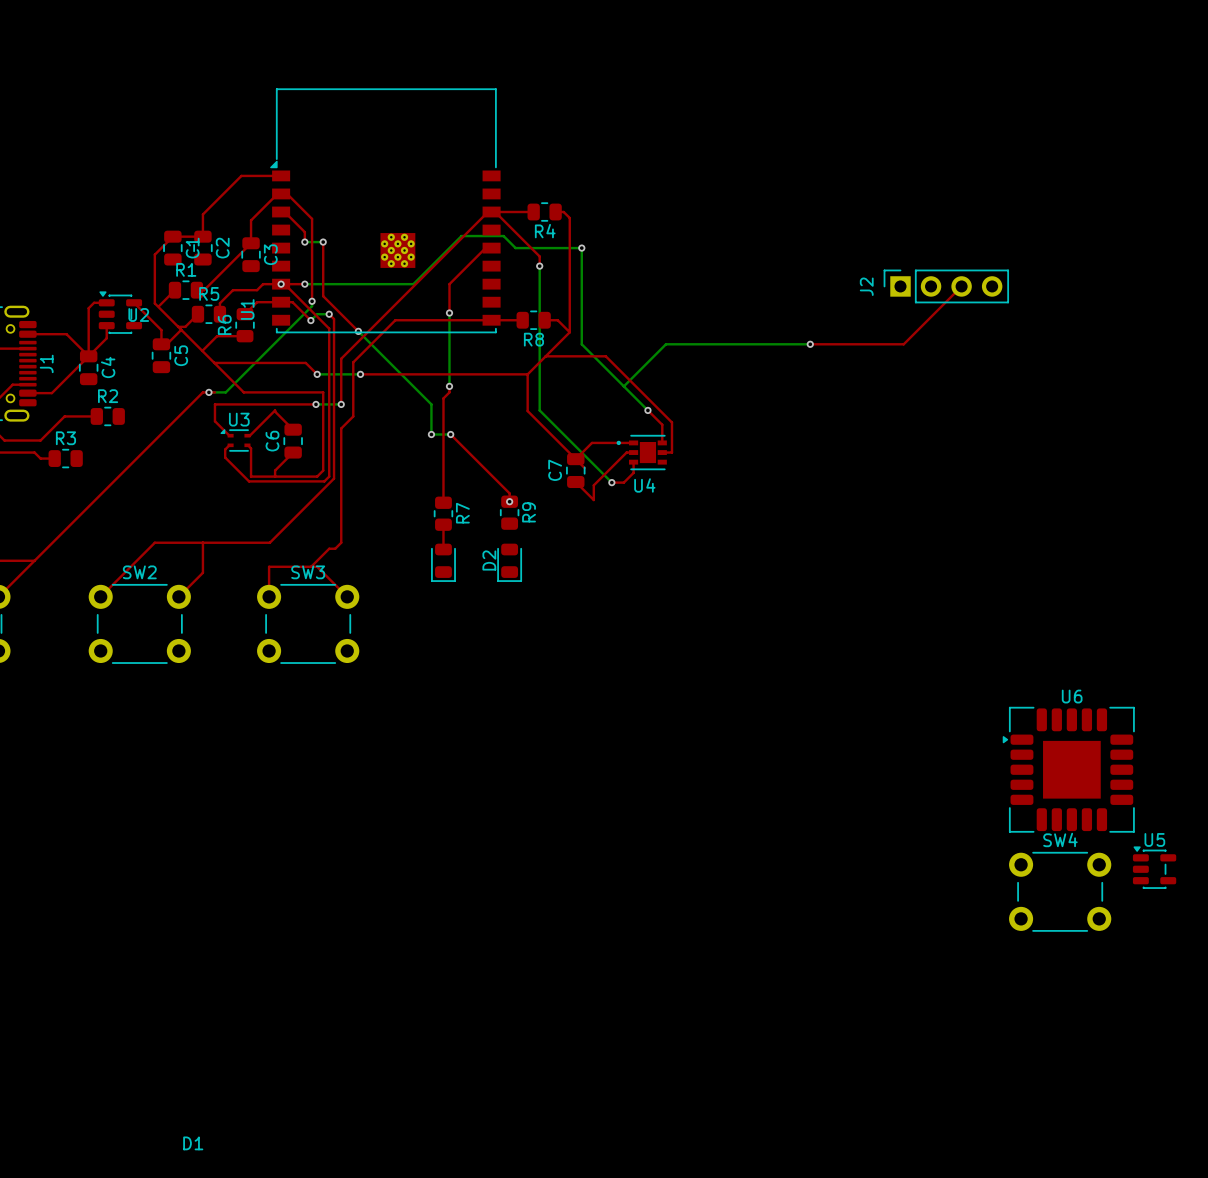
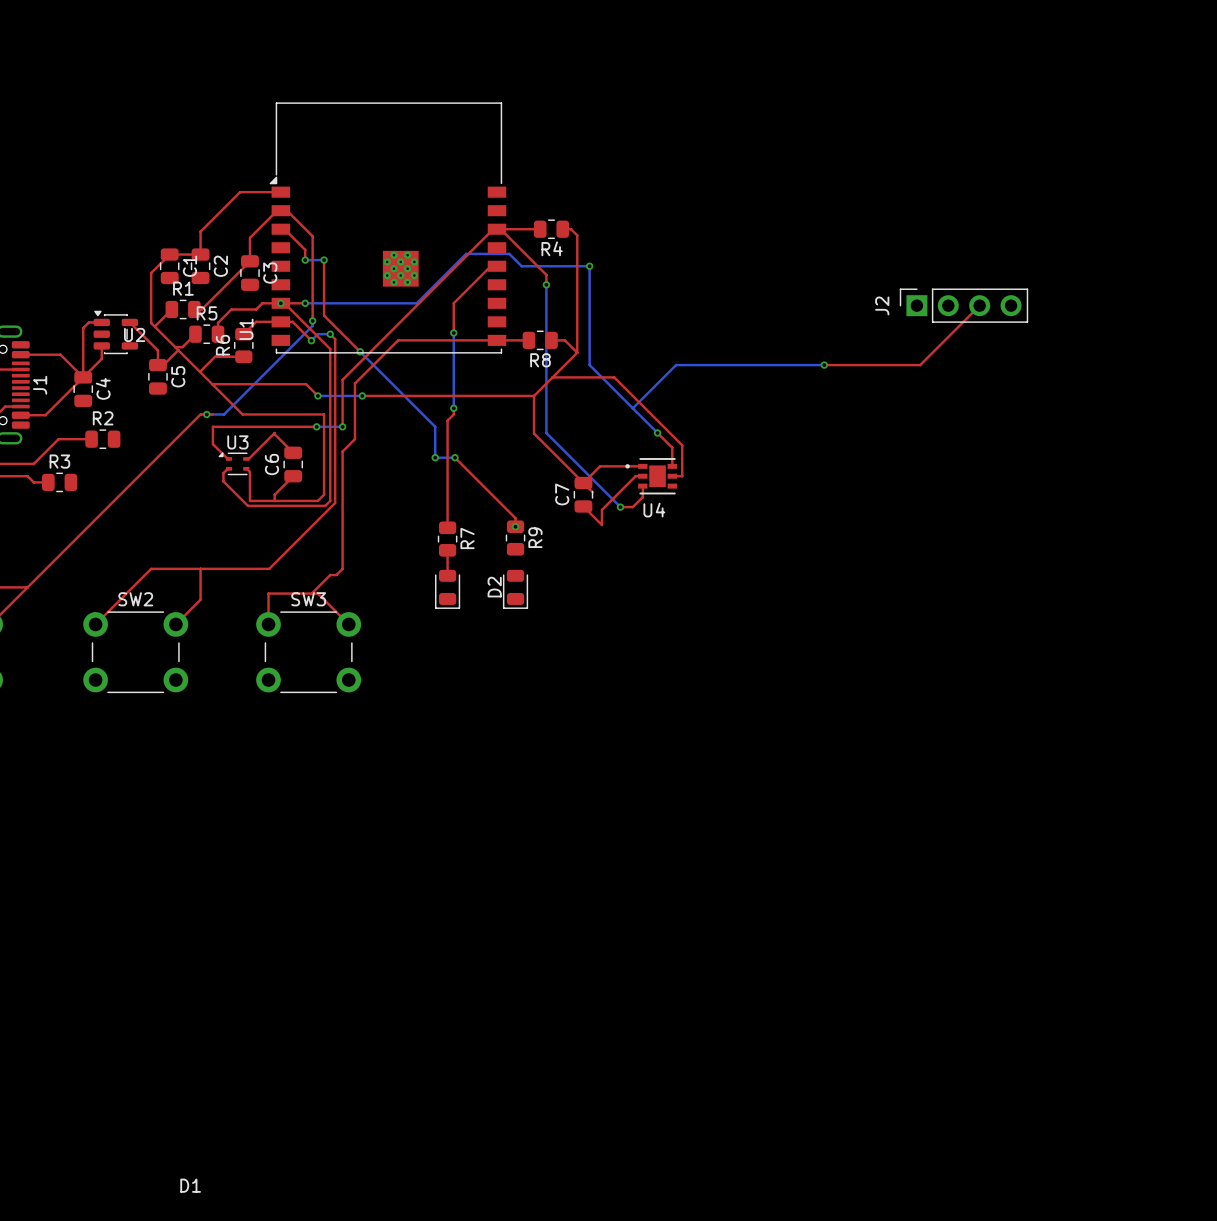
U6: (1068, 769) -> none
U5: (1154, 867) -> none
SW4: (1060, 891) -> none

